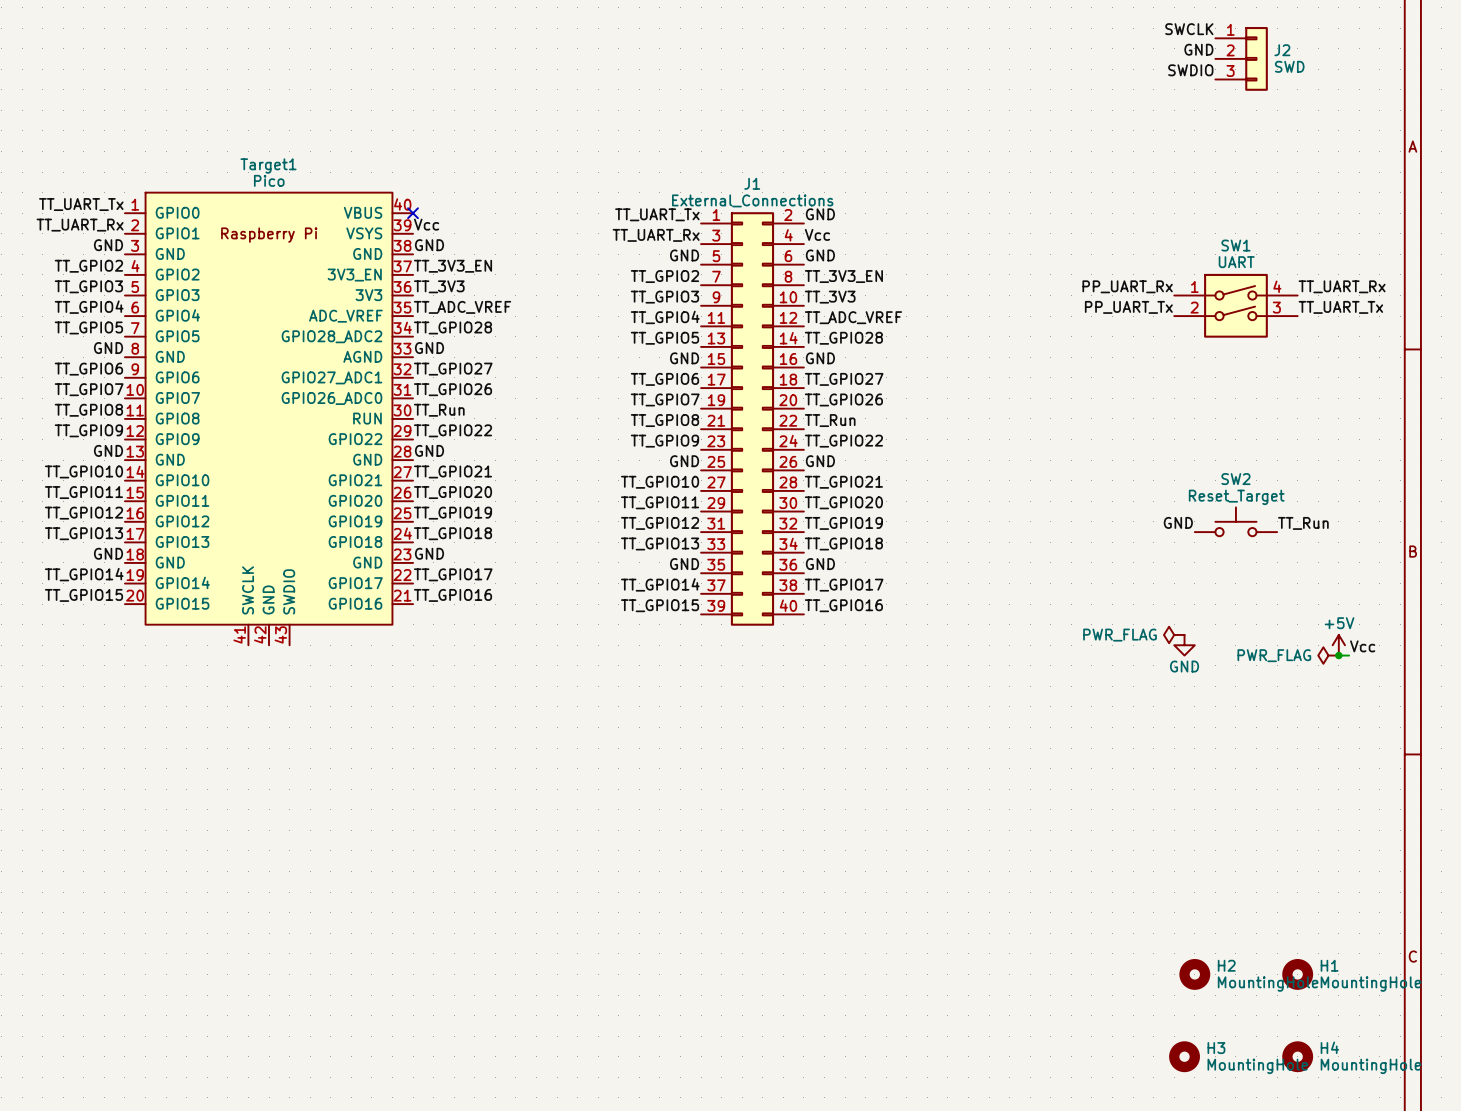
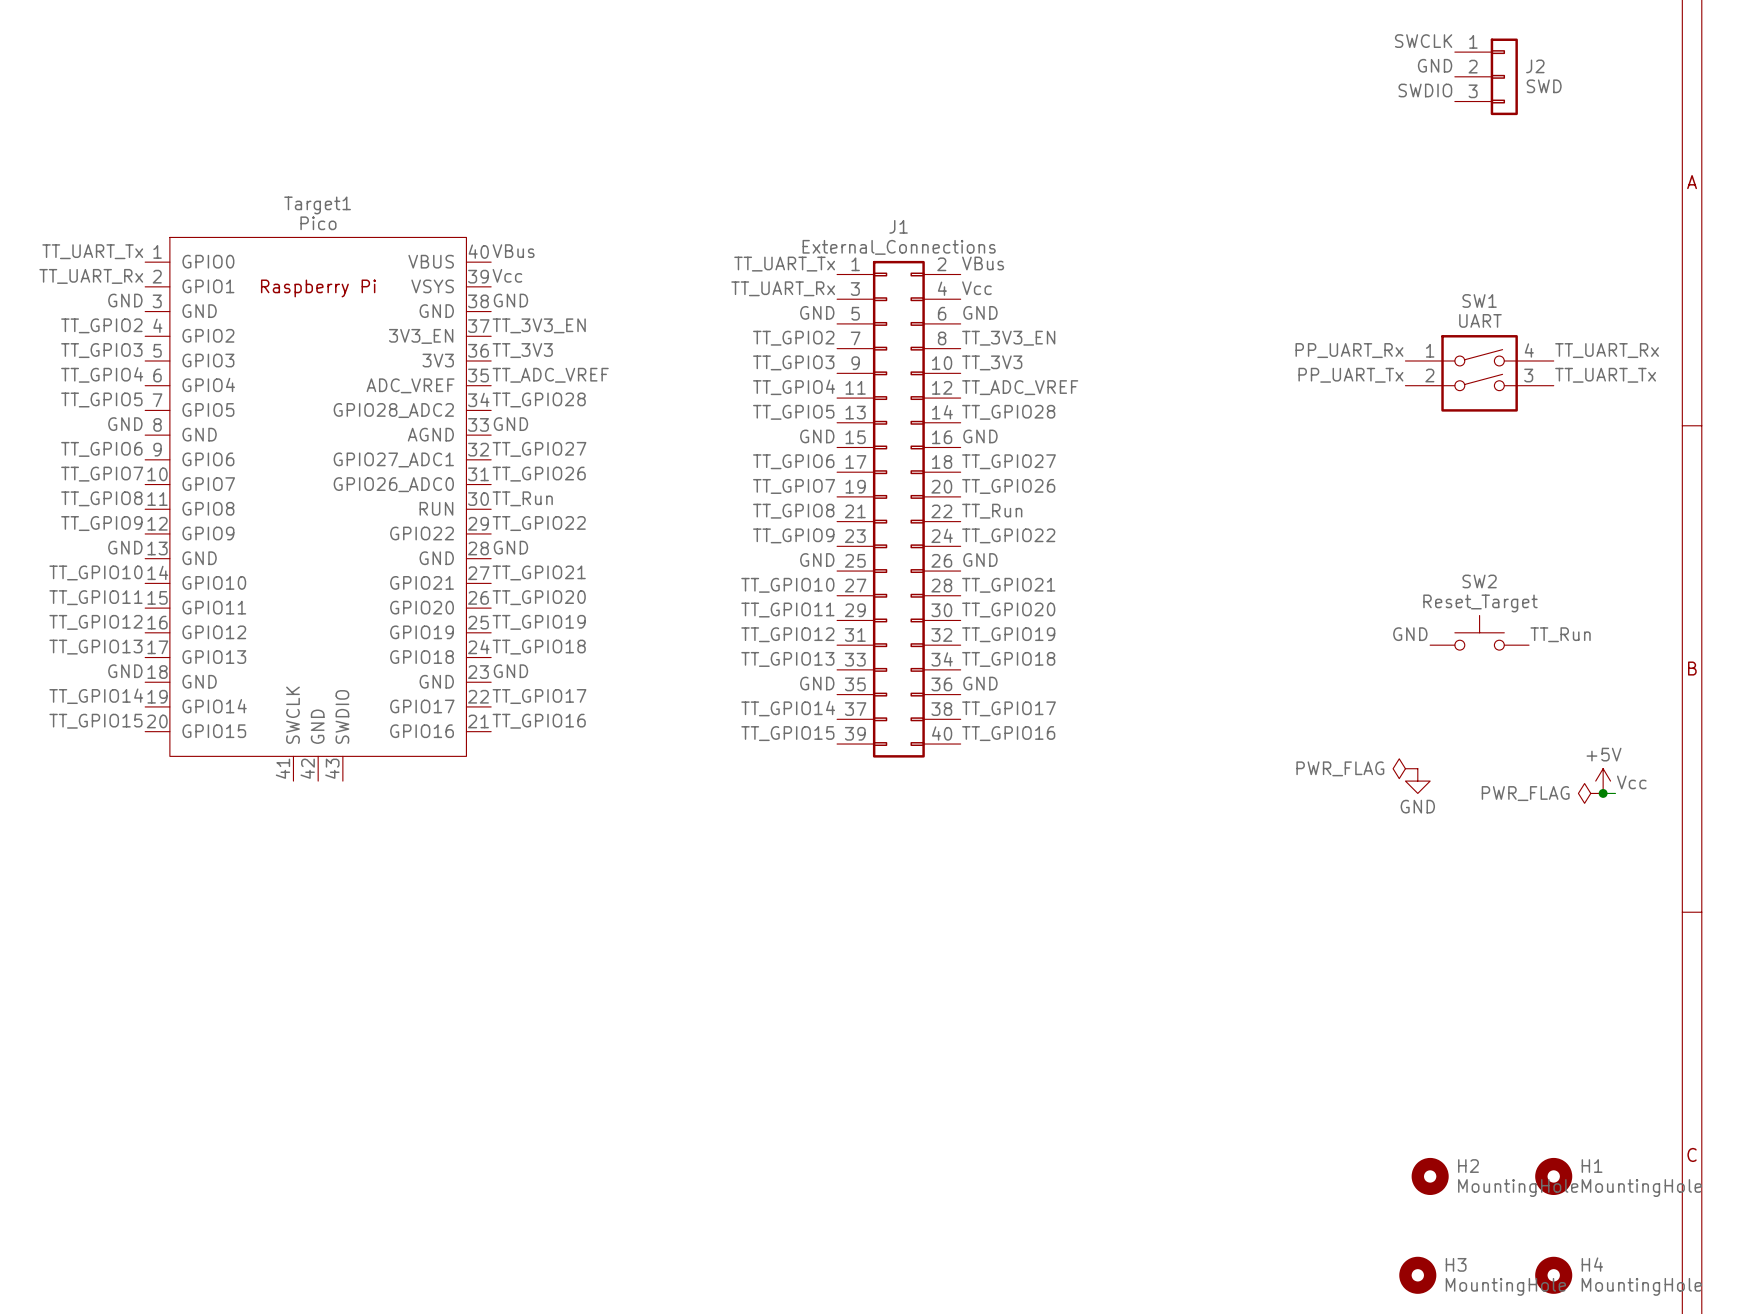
label: none -> VBus (513, 251)
no-connect mark: (413, 213) -> none
label: GND (820, 214) -> VBus (983, 263)

